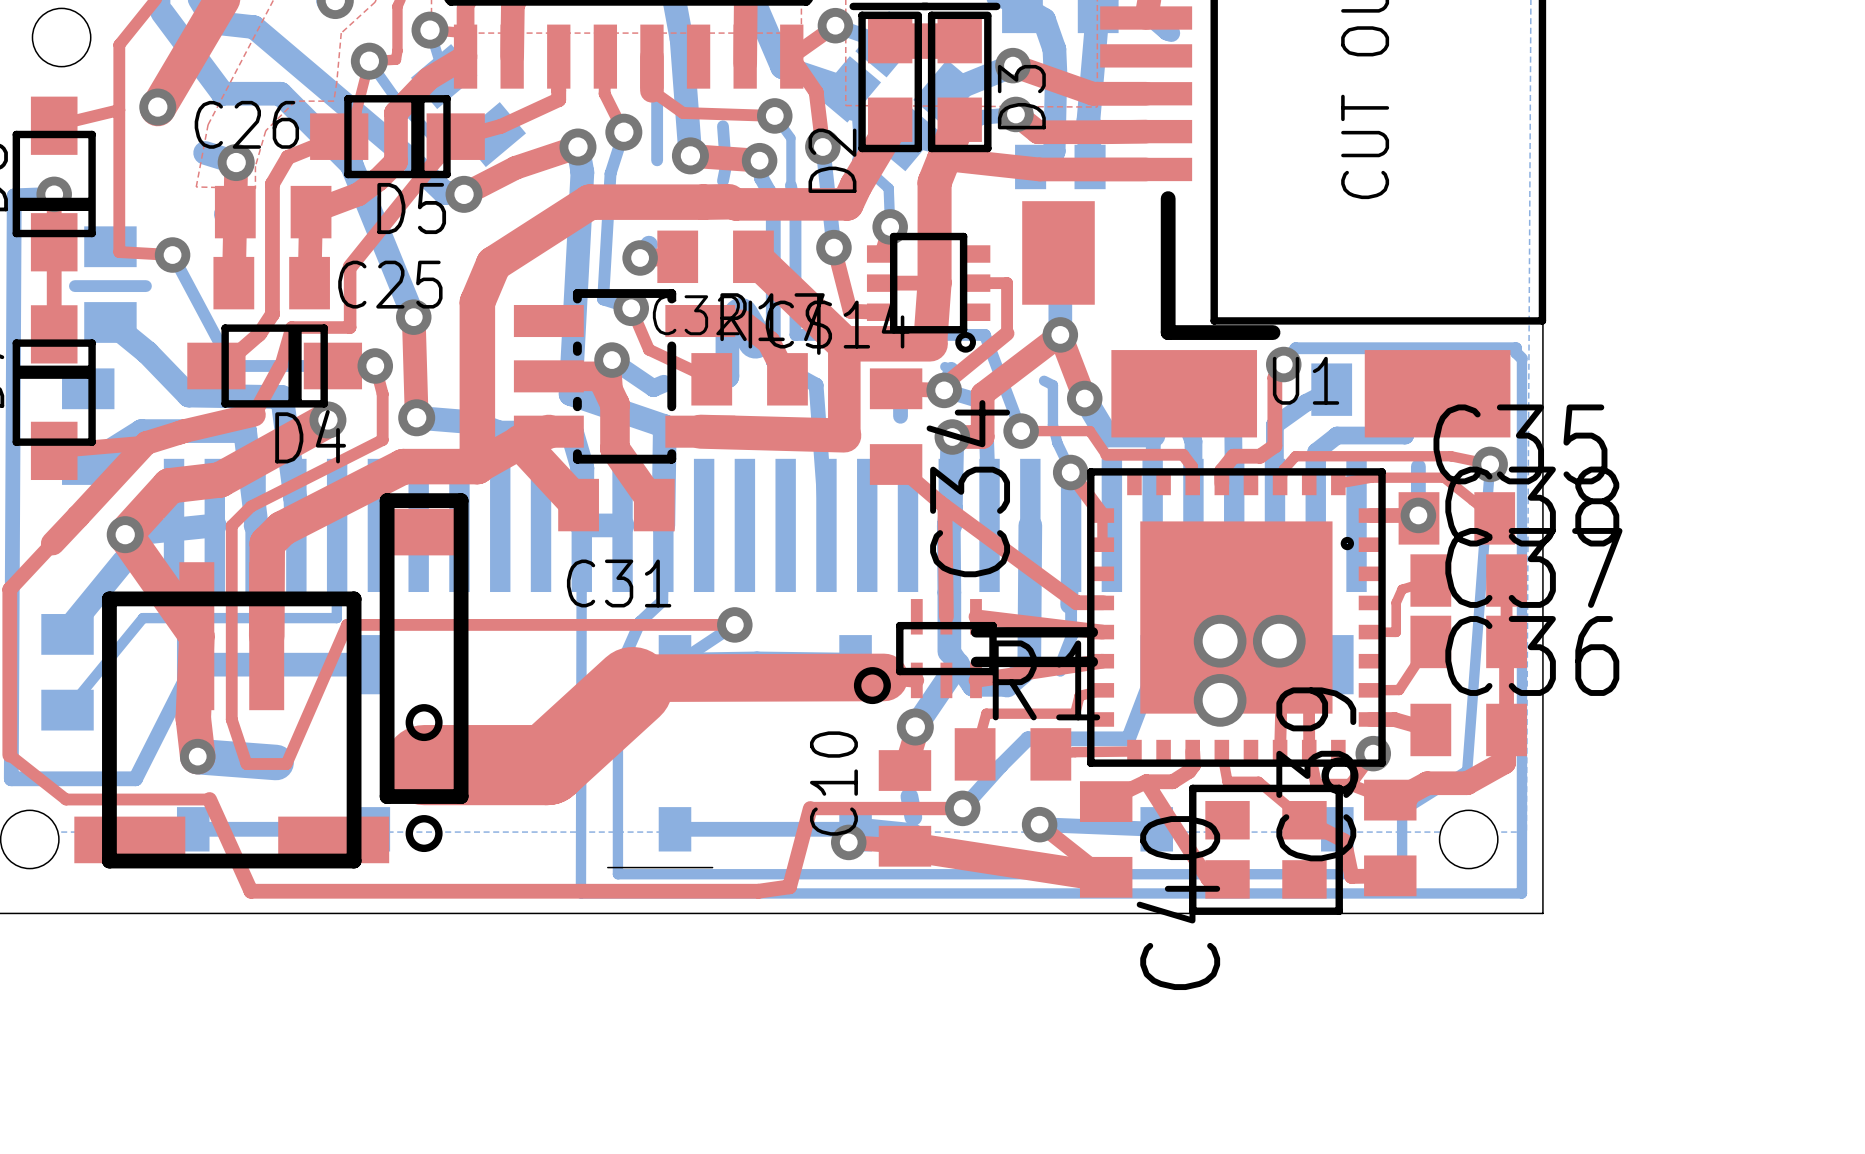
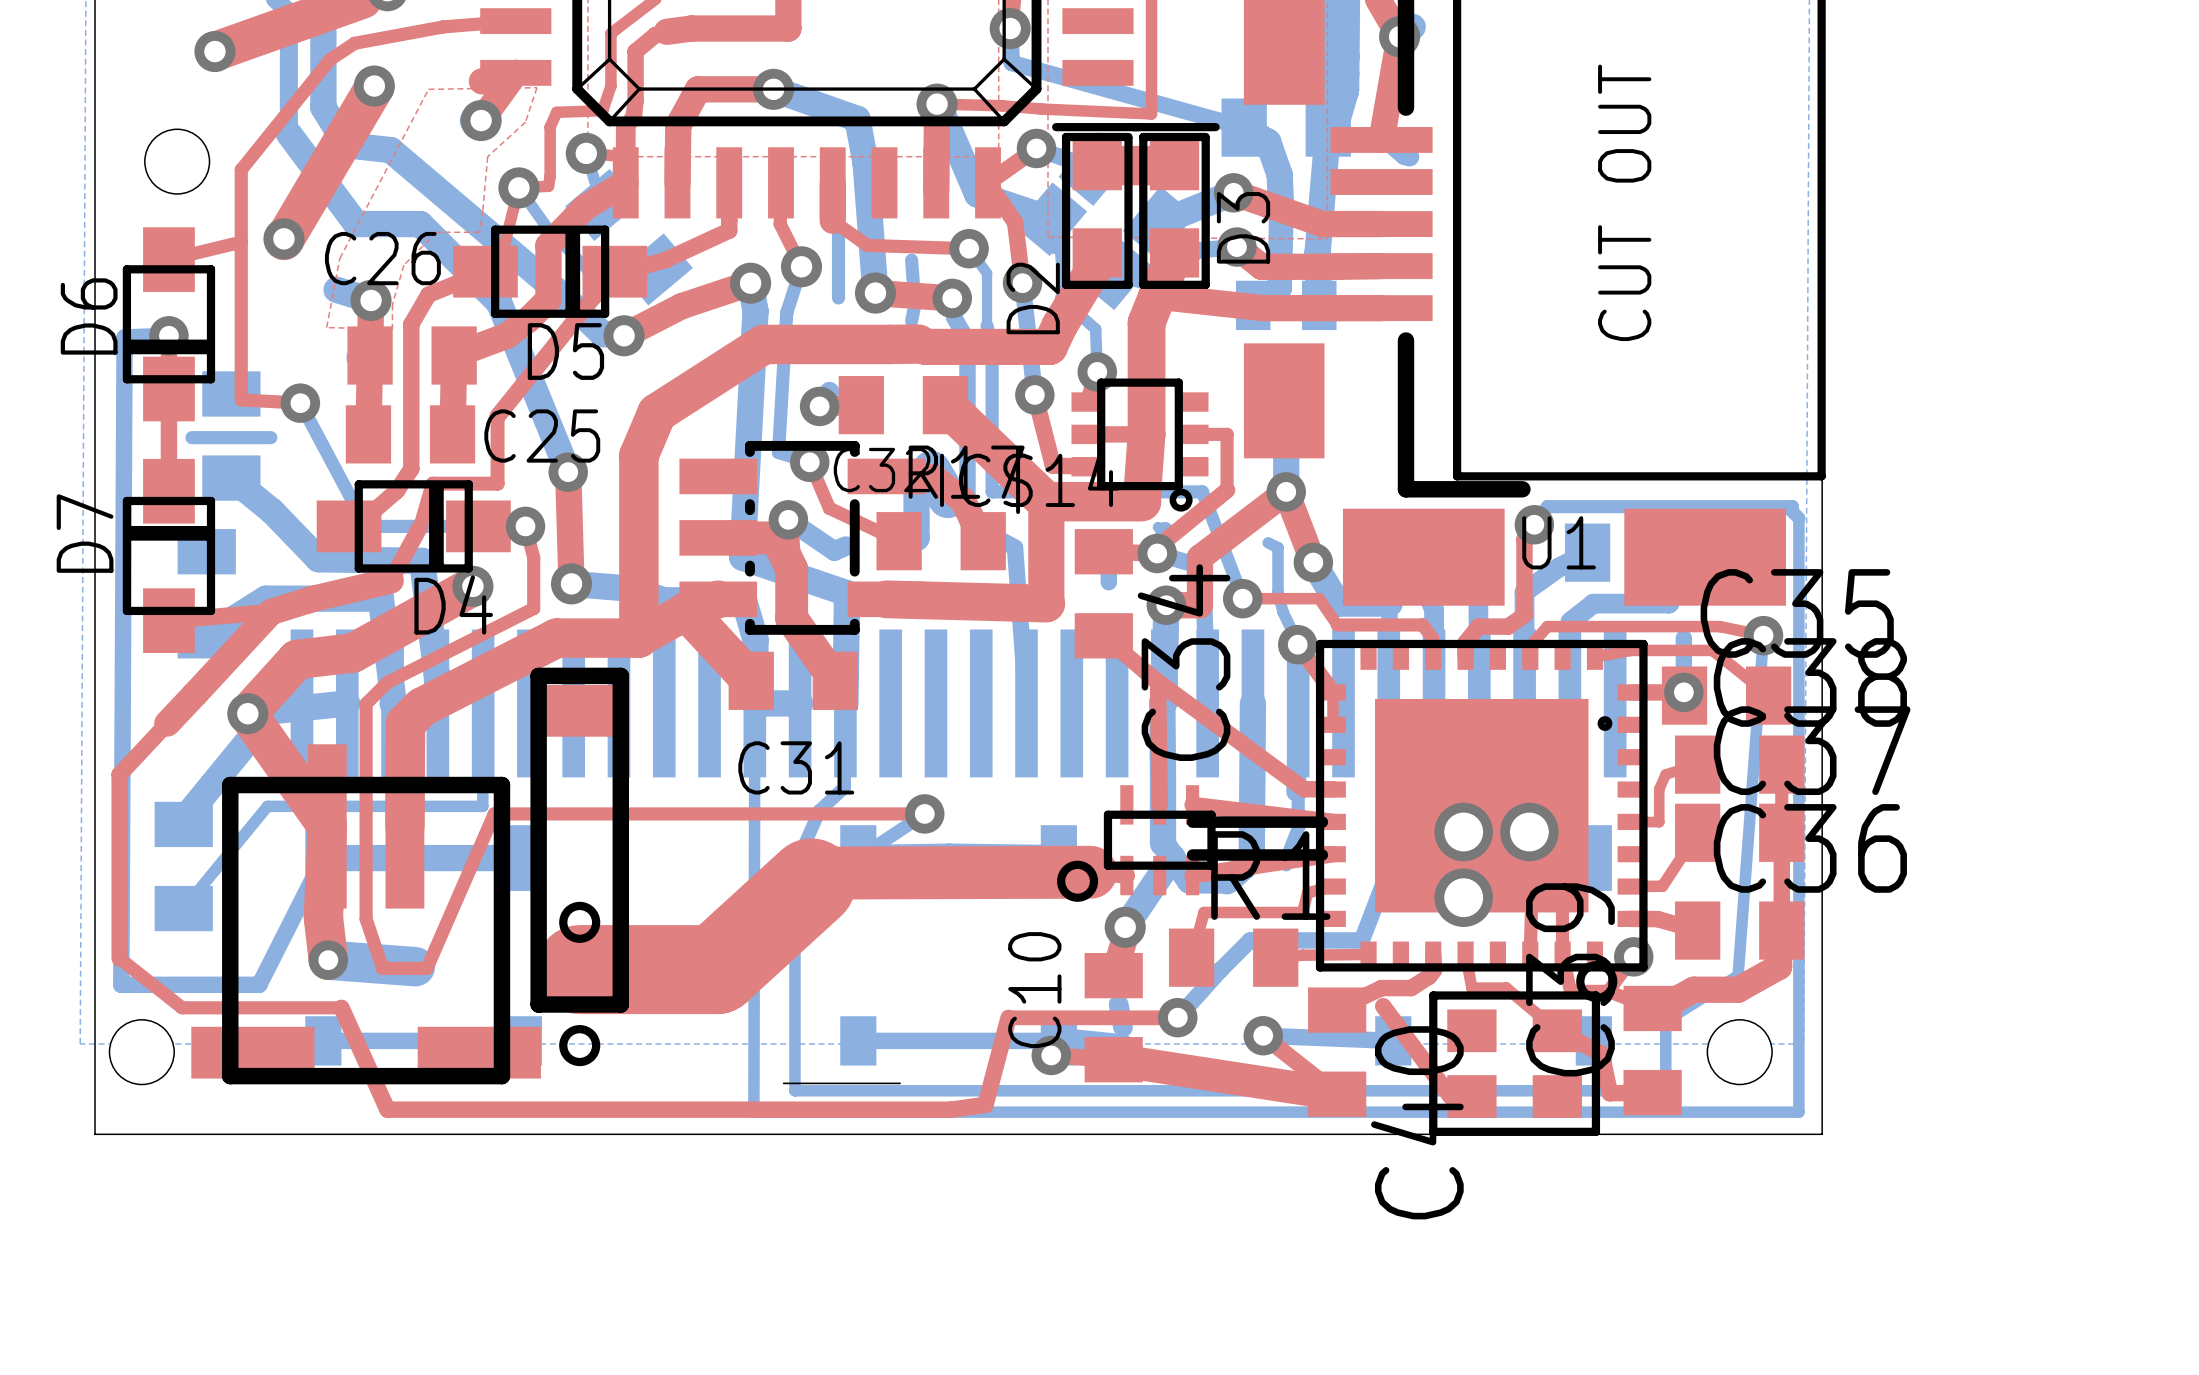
top track: (1146, 781) (1208, 879) -> (1383, 1006) (1450, 1096)

